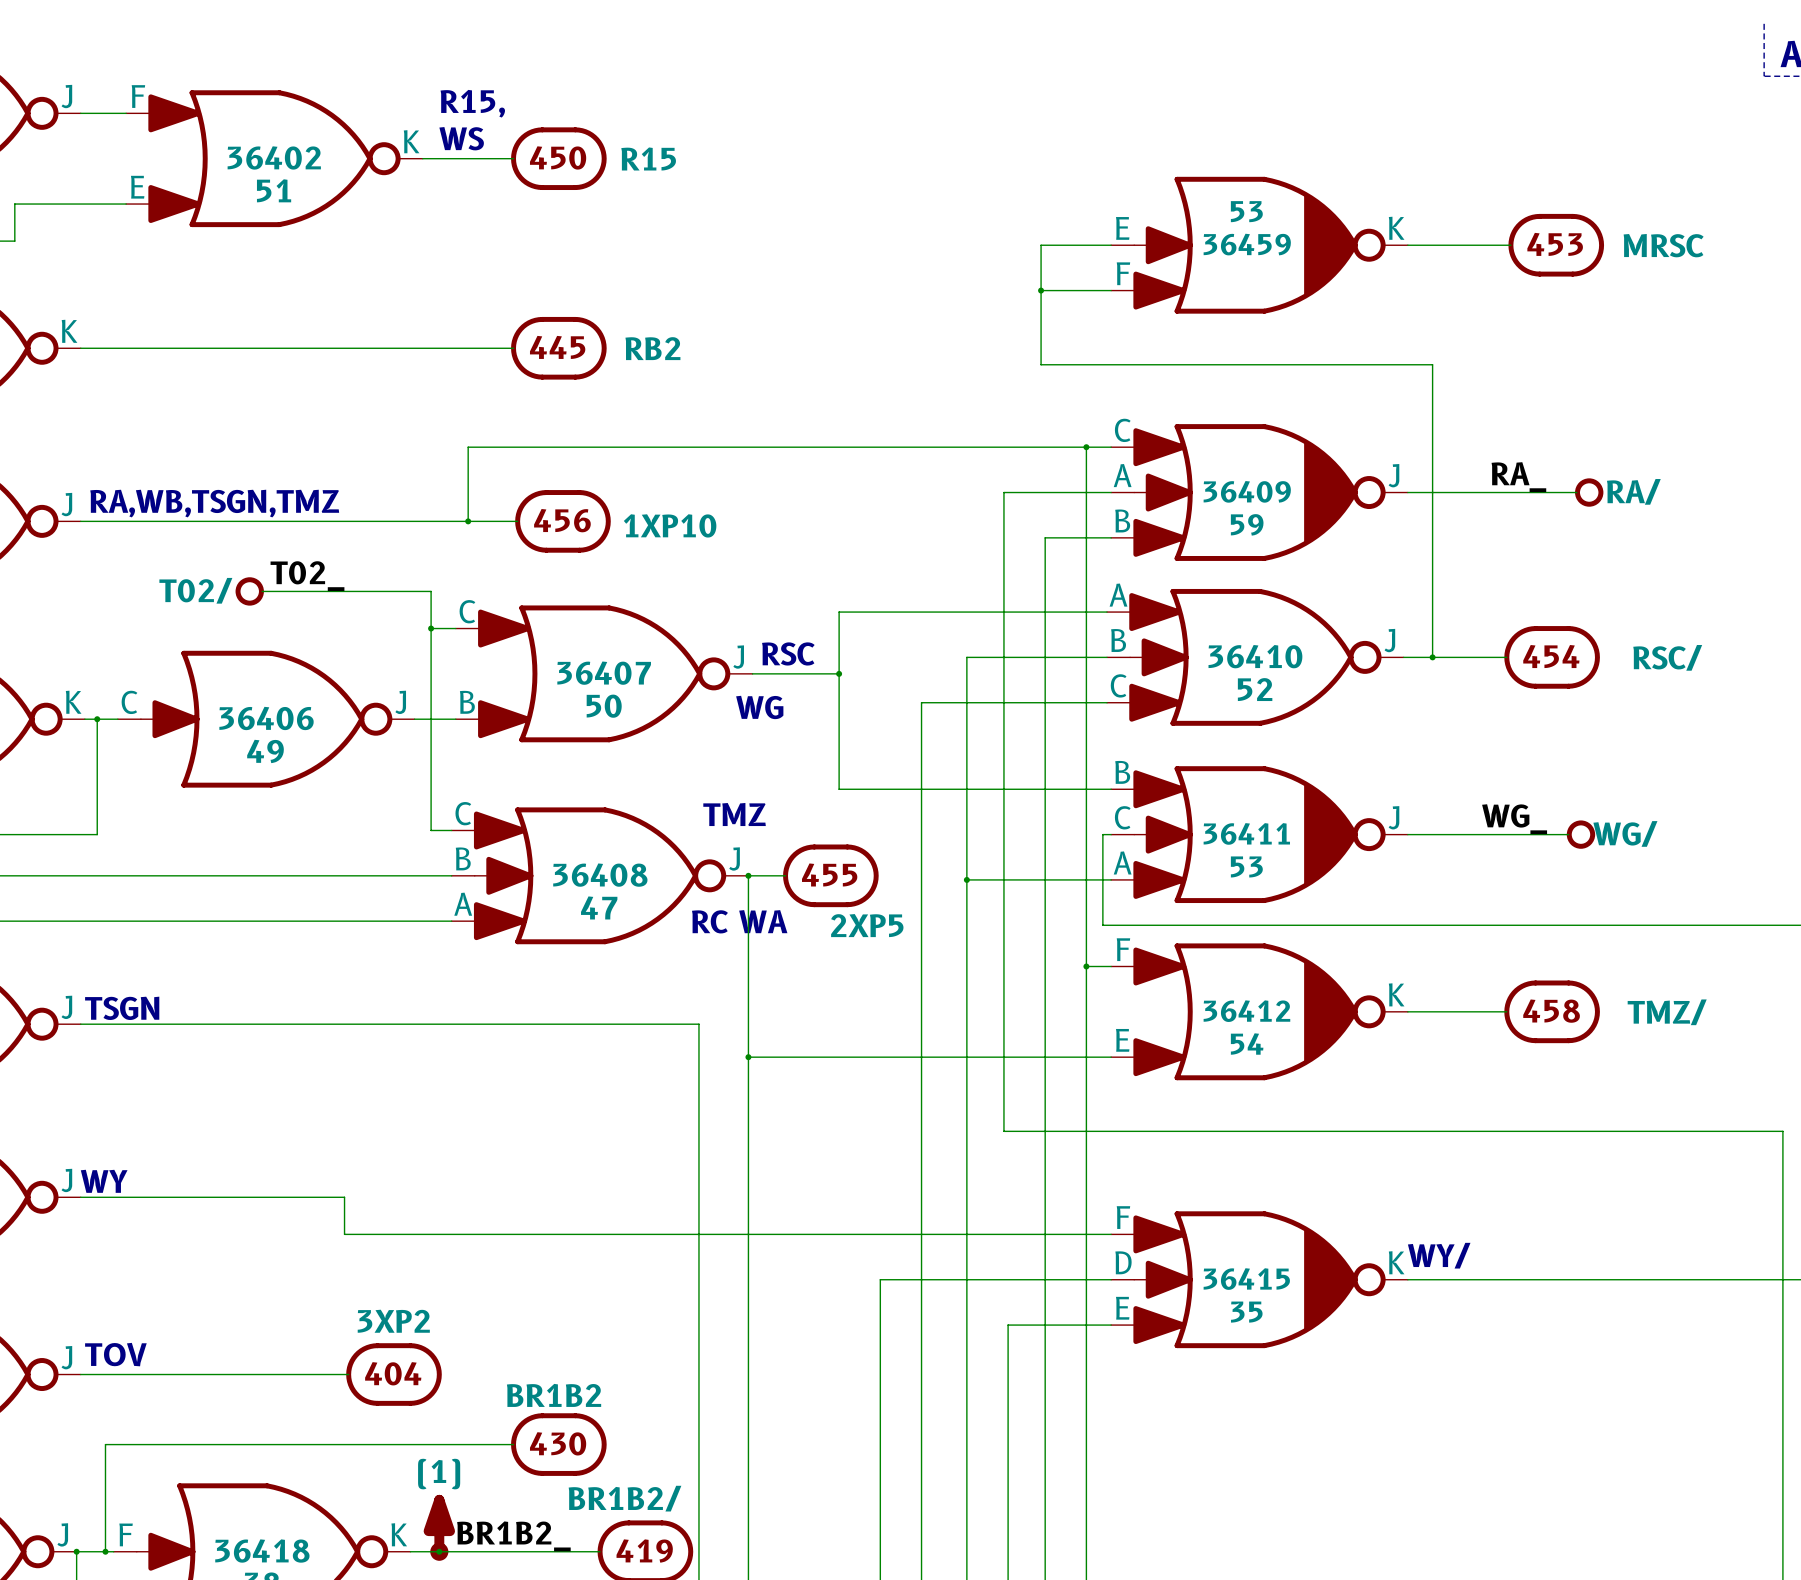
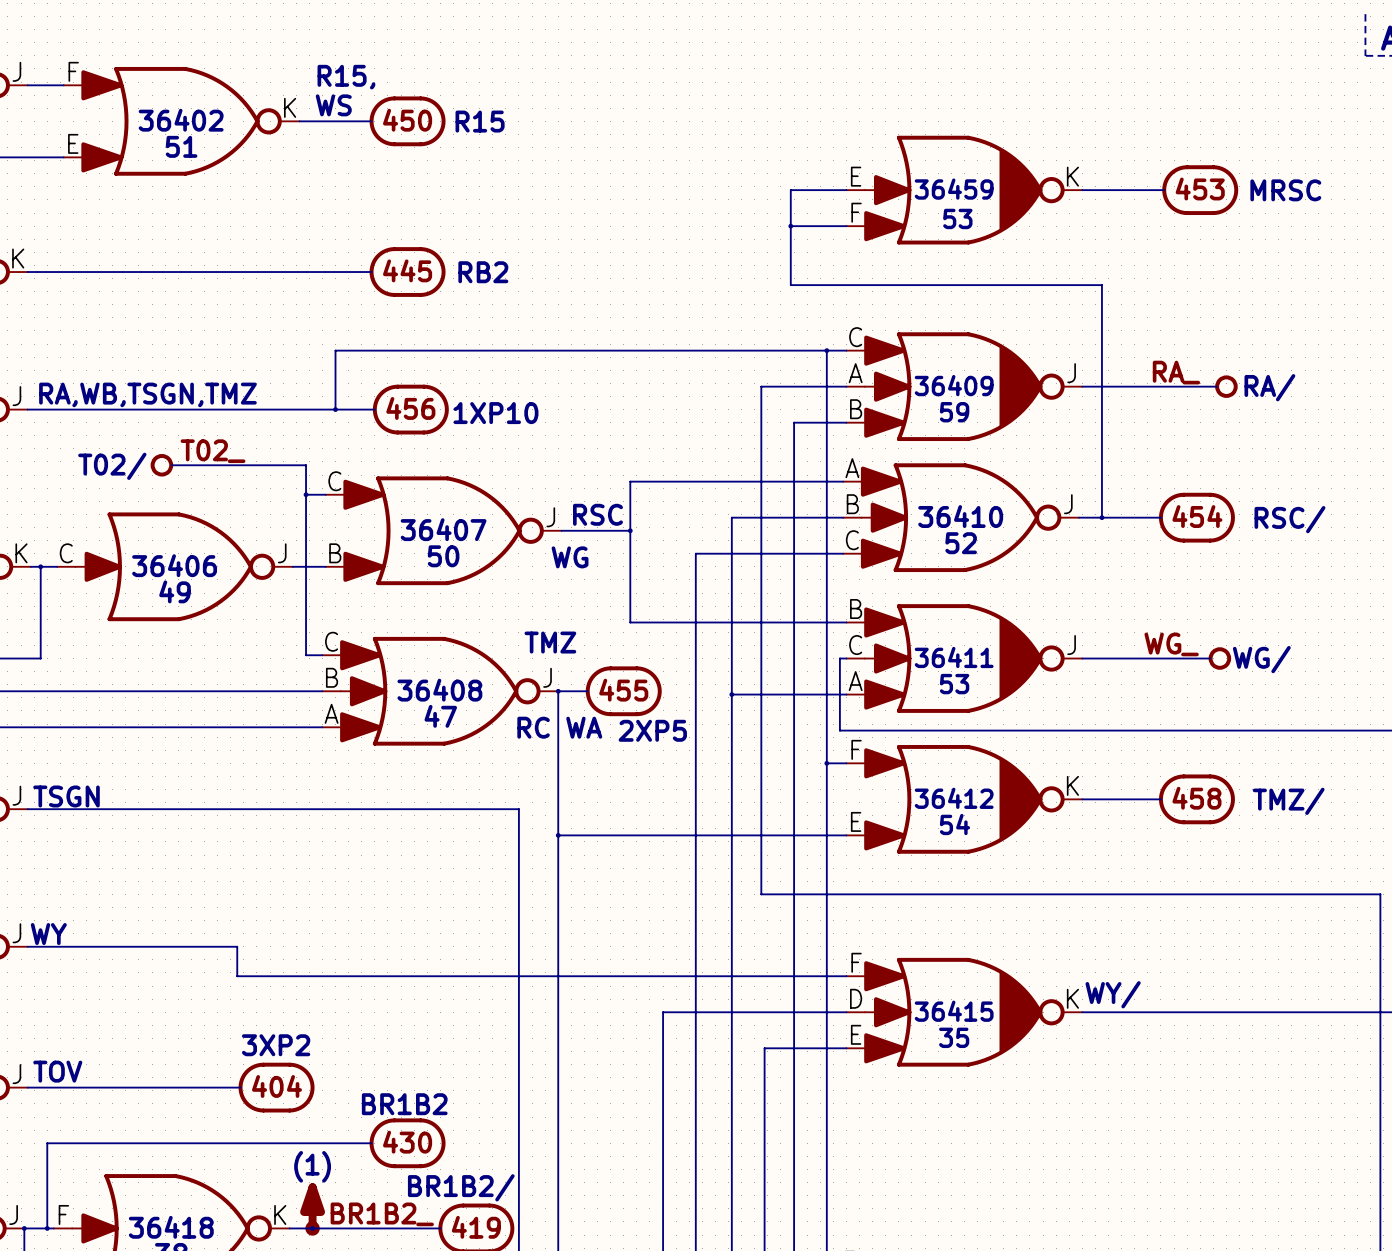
part text position: 53 (1246, 211) -> 53 (957, 218)

